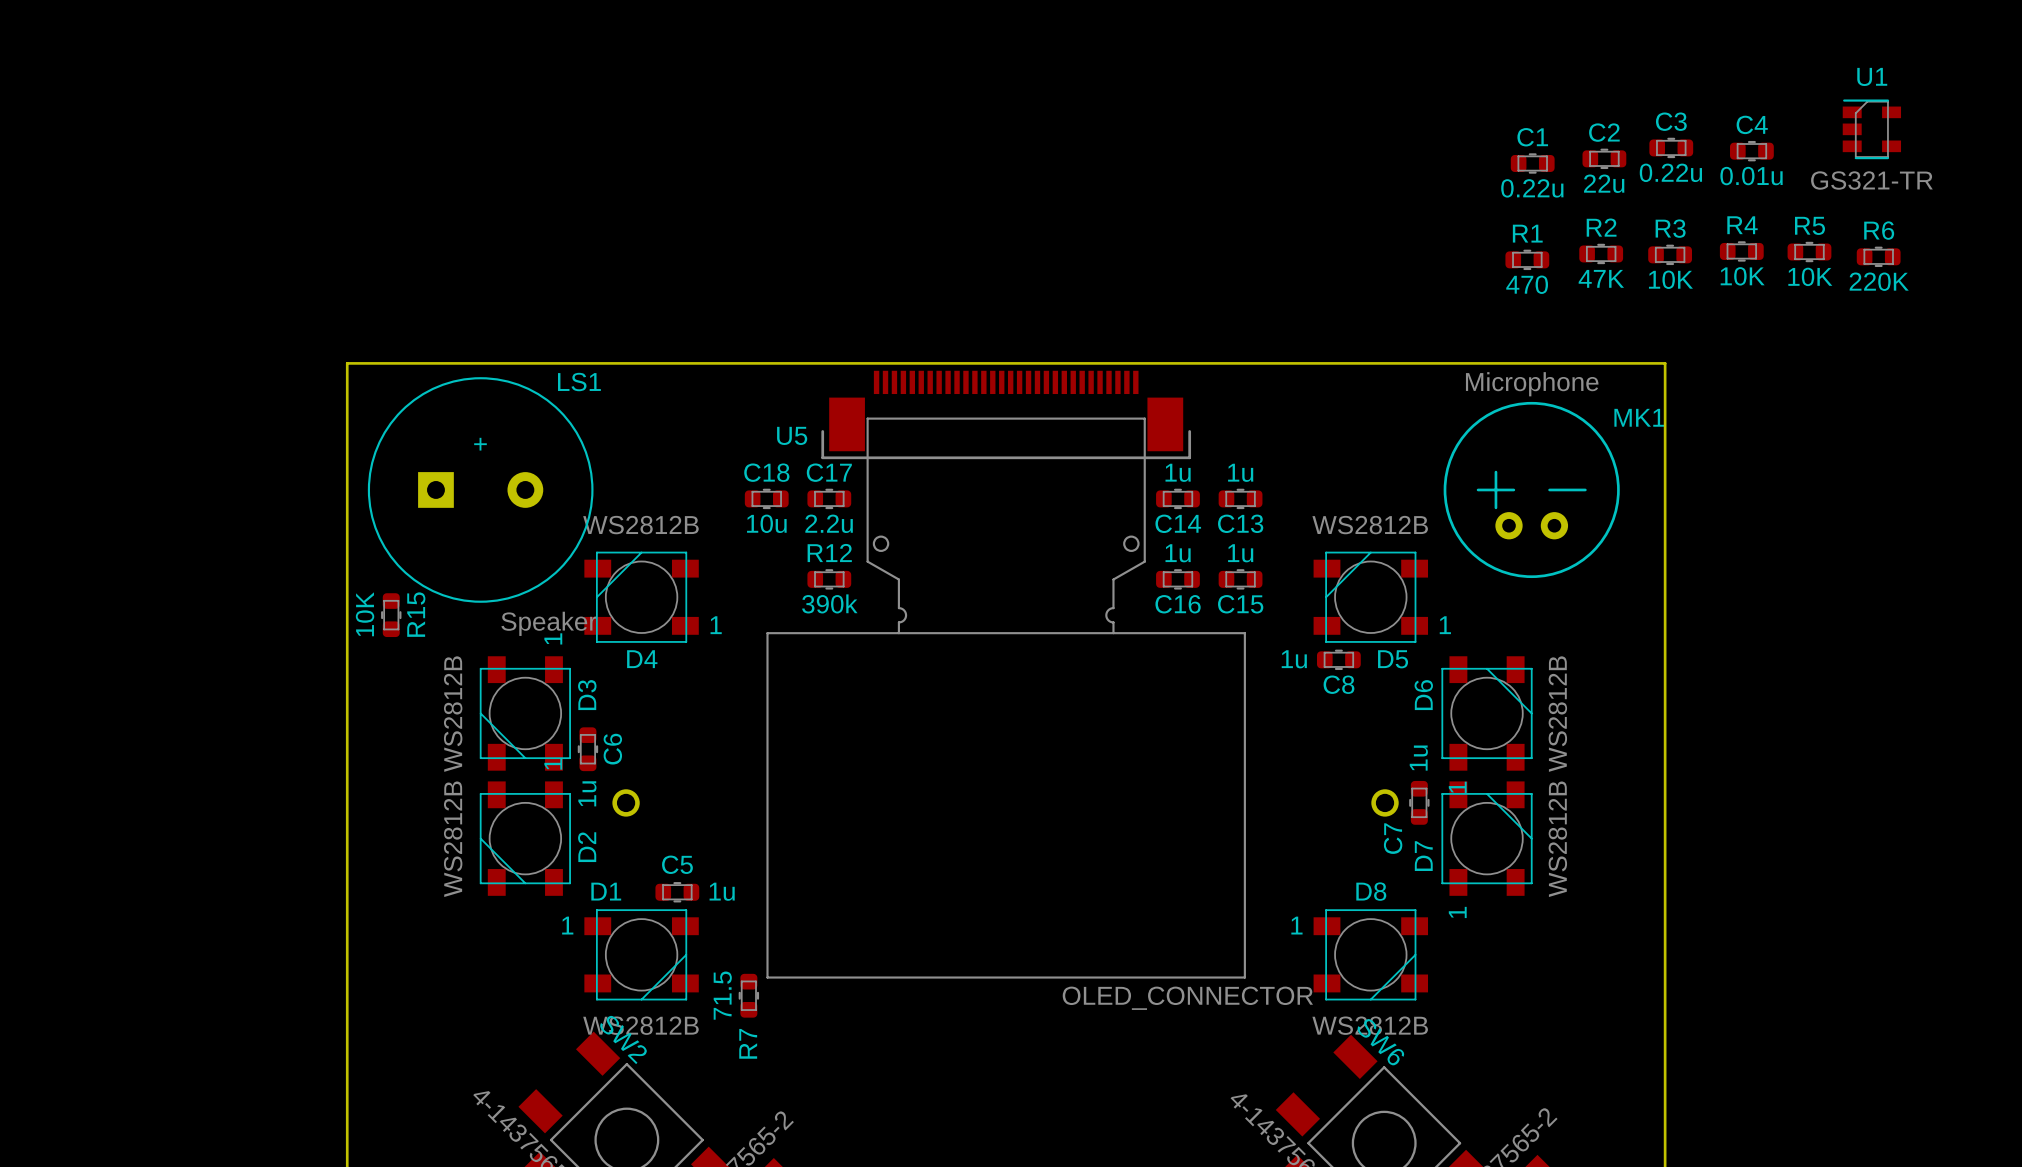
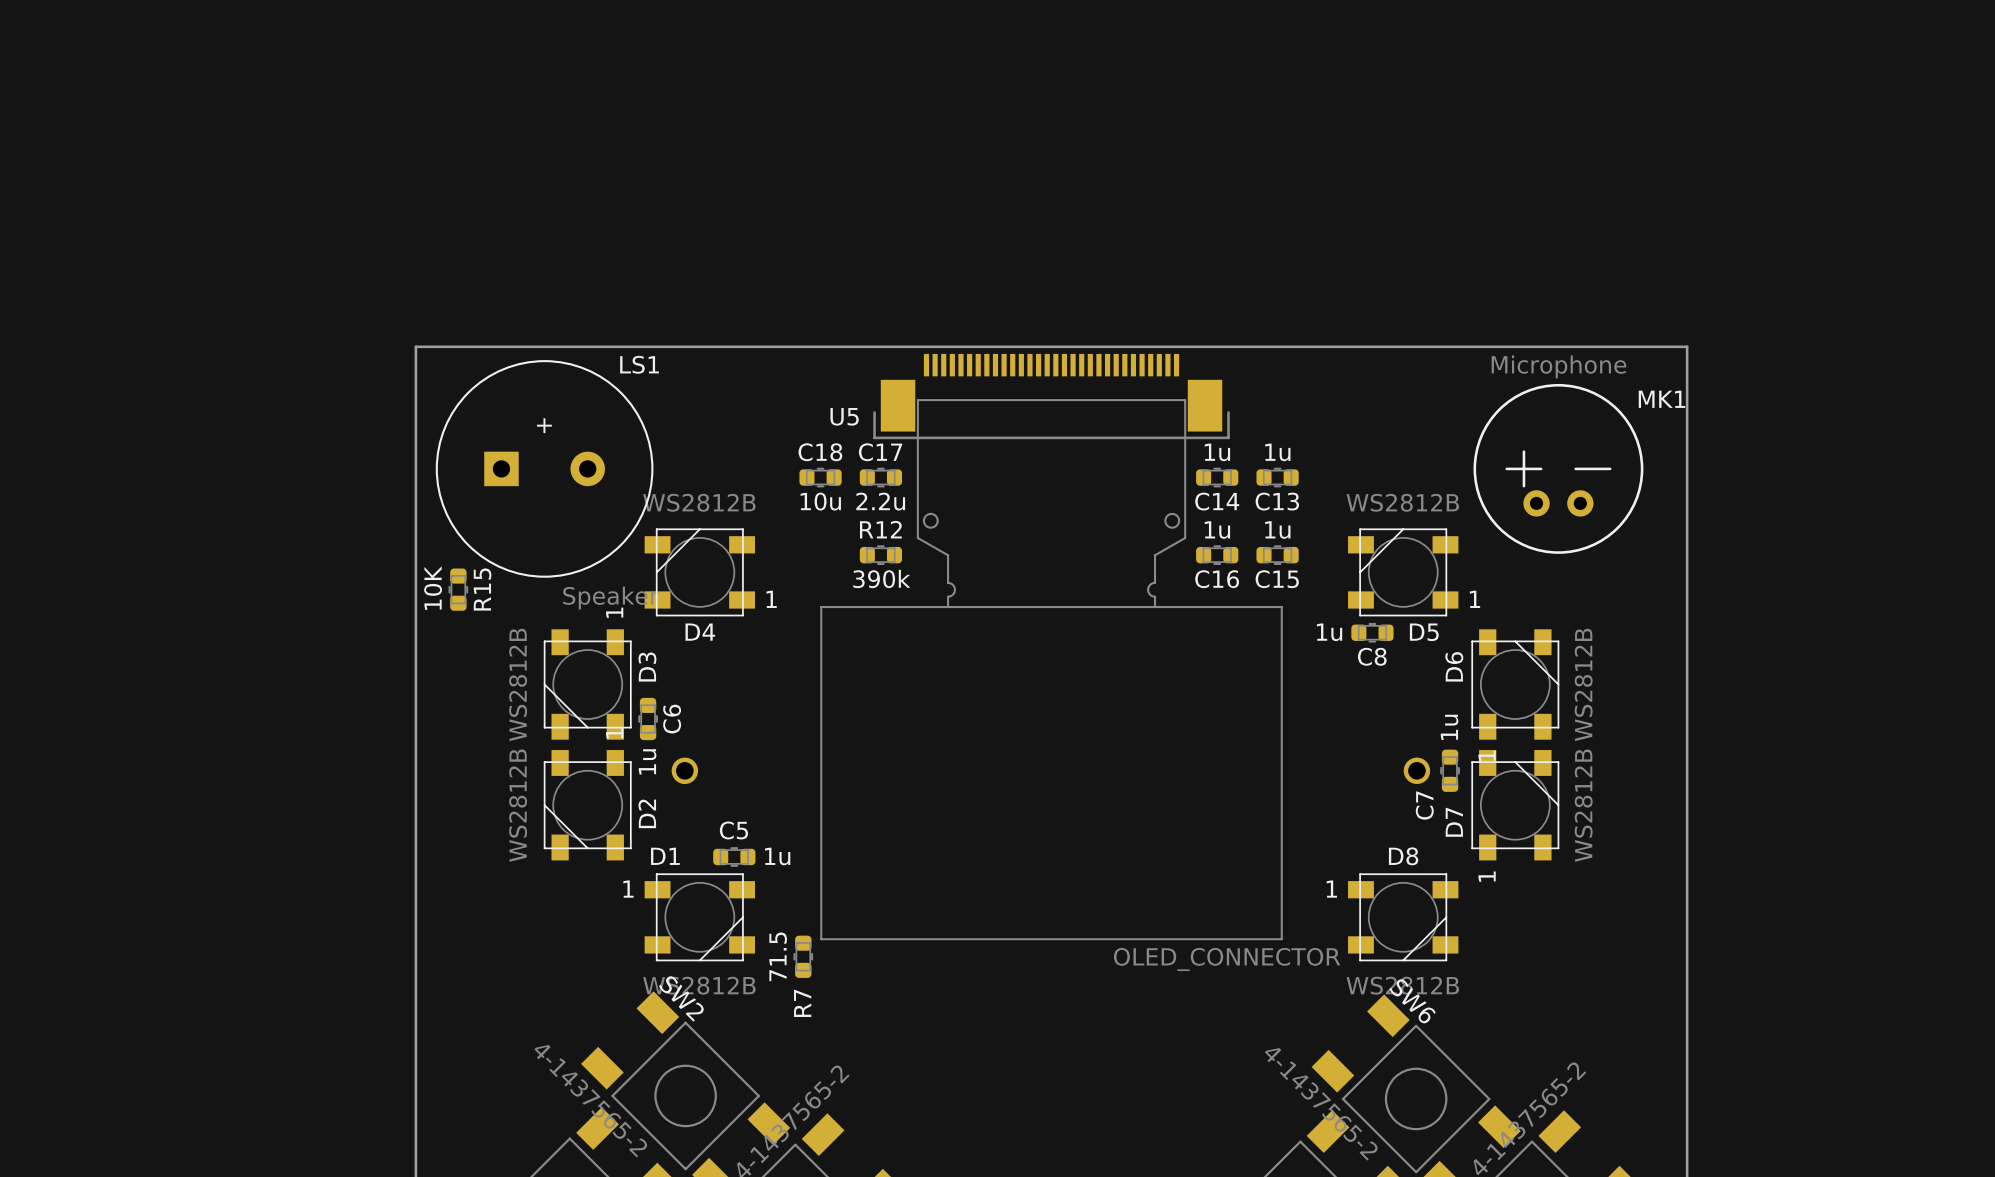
U1: GS321-TR (1871, 129) -> none
C3: 0.22u (1671, 147) -> none
C4: 0.01u (1751, 151) -> none
C2: 22u (1604, 158) -> none
C1: 0.22u (1532, 163) -> none
R4: 10K (1741, 251) -> none
R5: 10K (1809, 251) -> none
R2: 47K (1601, 253) -> none
R3: 10K (1670, 254) -> none
R6: 220K (1878, 256) -> none
R1: 470 (1527, 259) -> none

